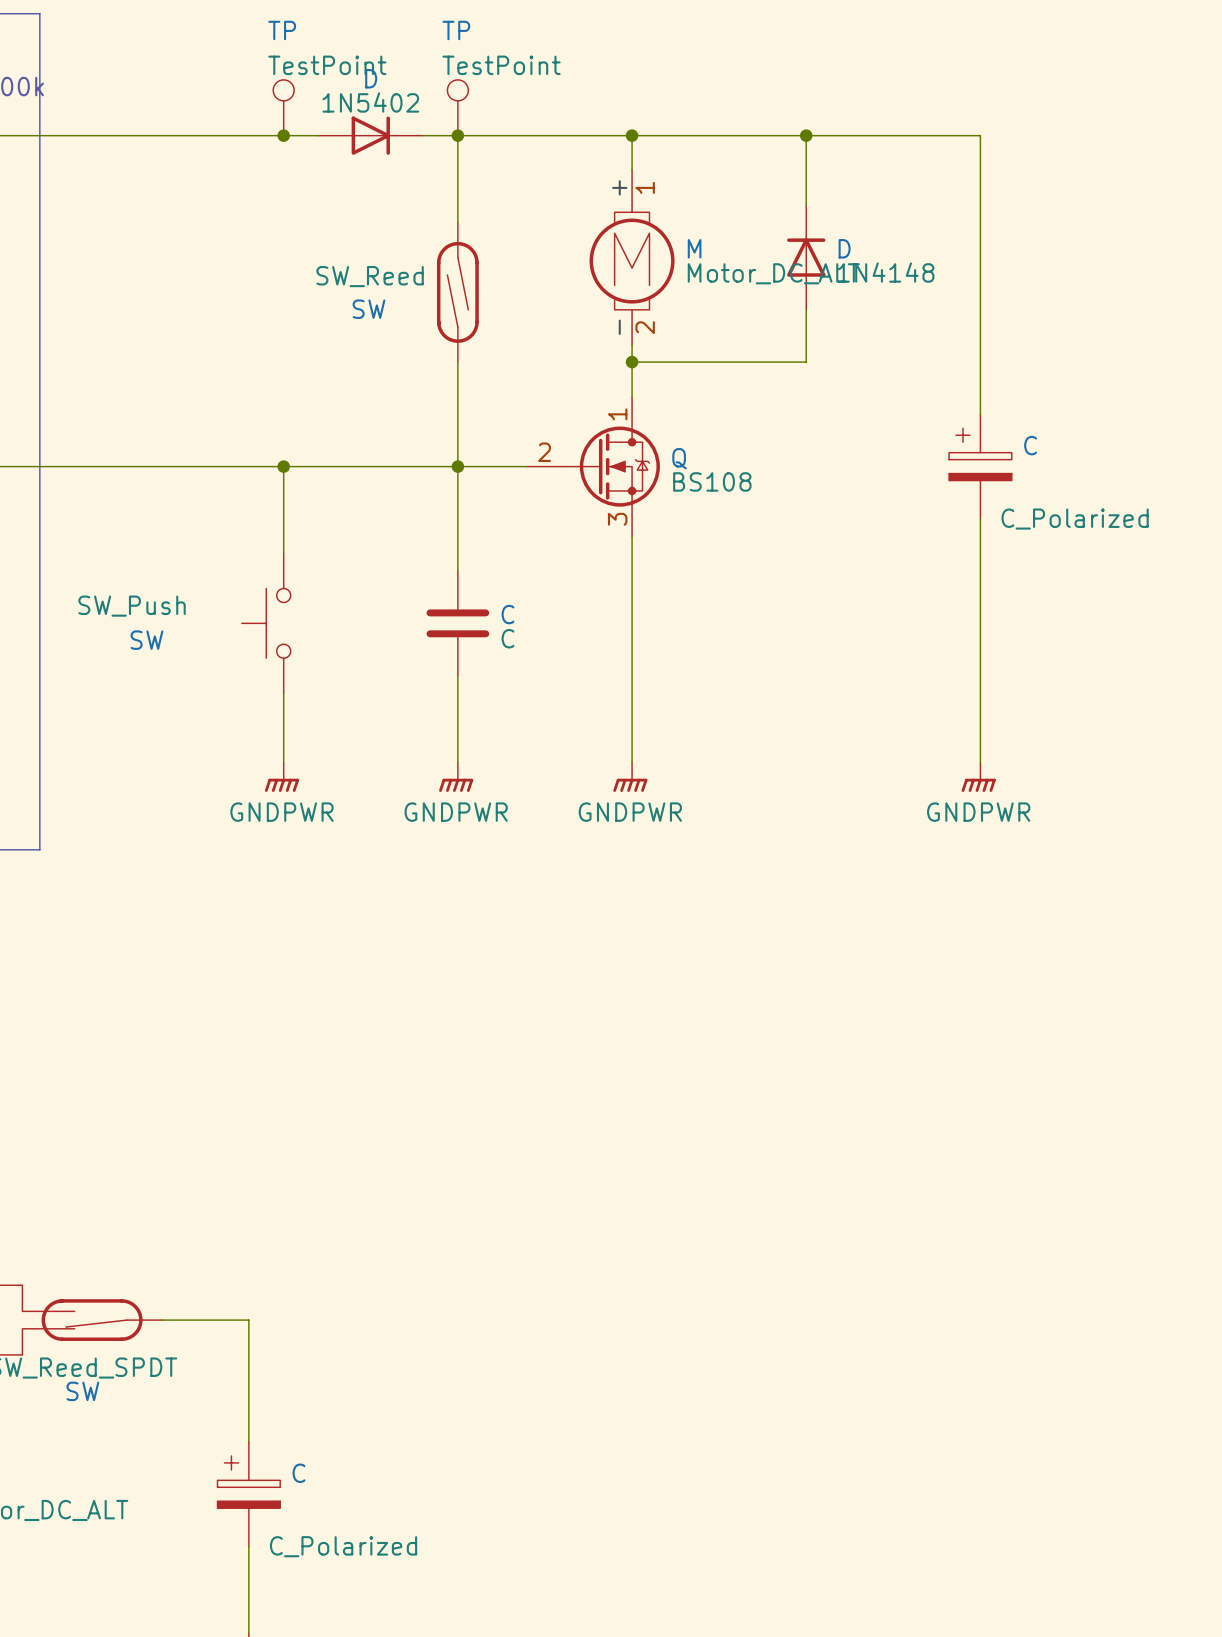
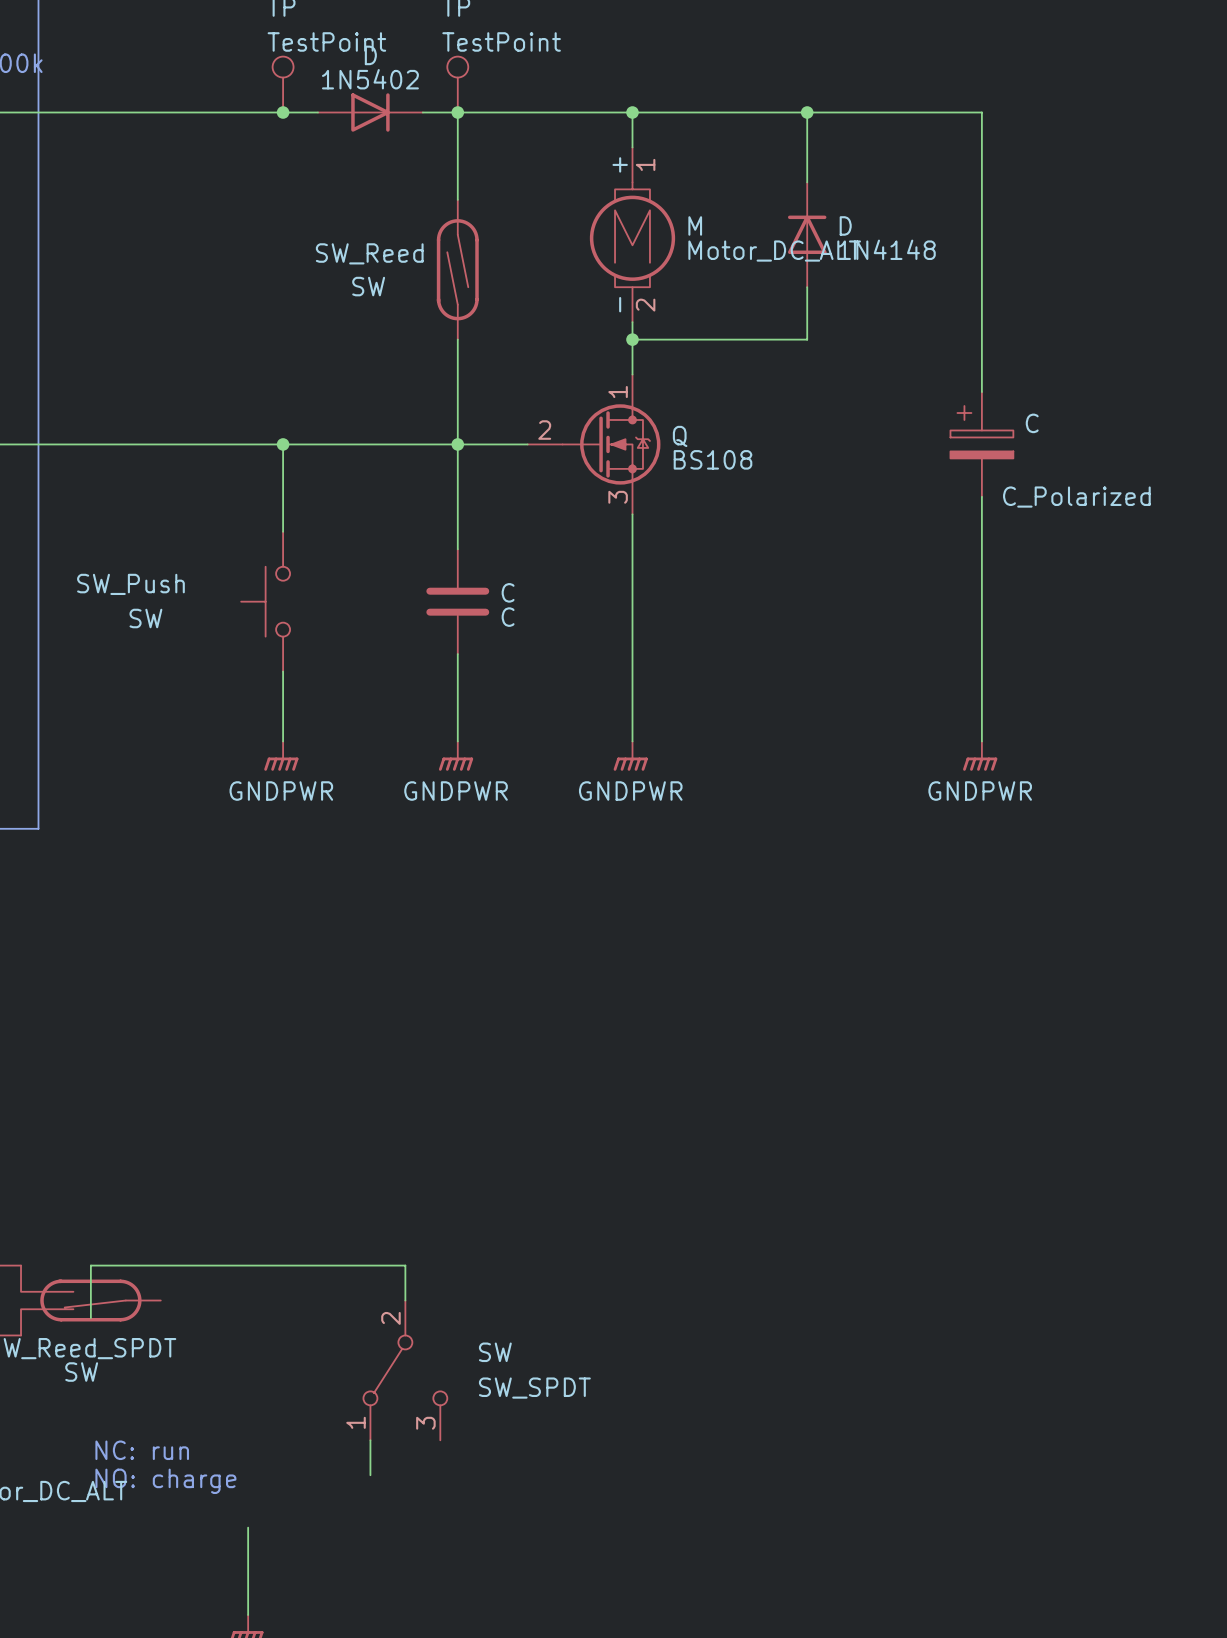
wire: (161, 1320) (248, 1320) (248, 1442) -> none
wire: none -> (405, 1300) (405, 1265) (90, 1265) (90, 1317)
SW: none -> SW_SPDT (405, 1370)
wire: none -> (370, 1440) (370, 1475)
text: none -> NC: run (142, 1450)
C: C_Polarized (248, 1494) -> none
text: none -> NO: charge (165, 1481)

